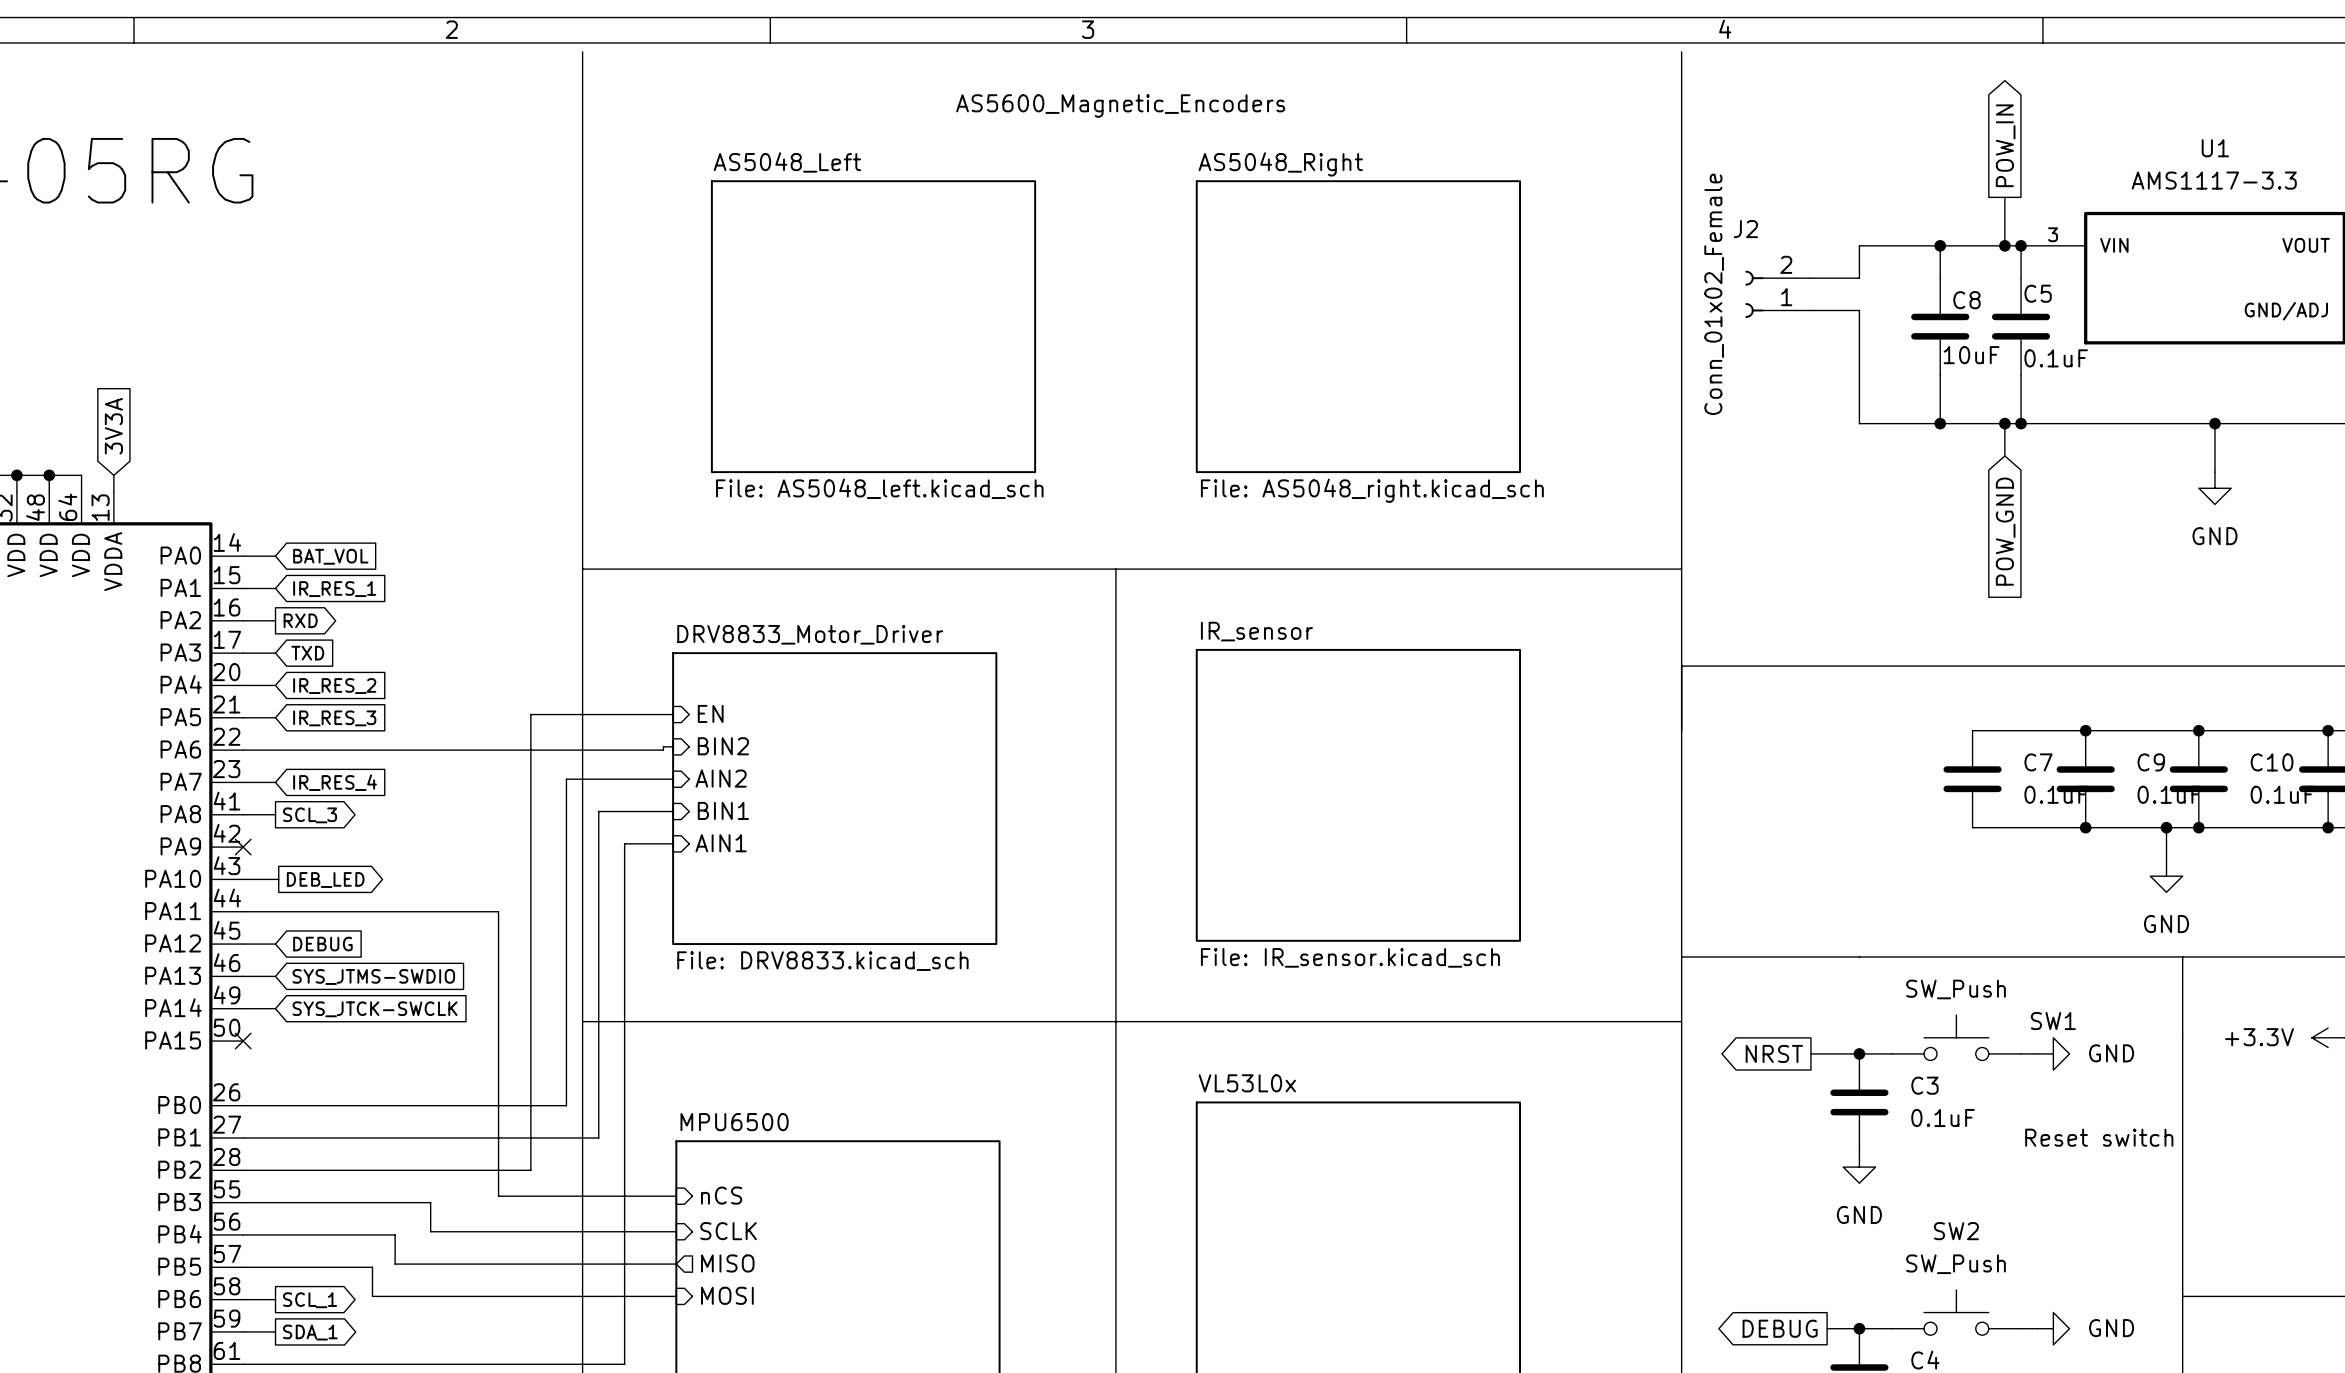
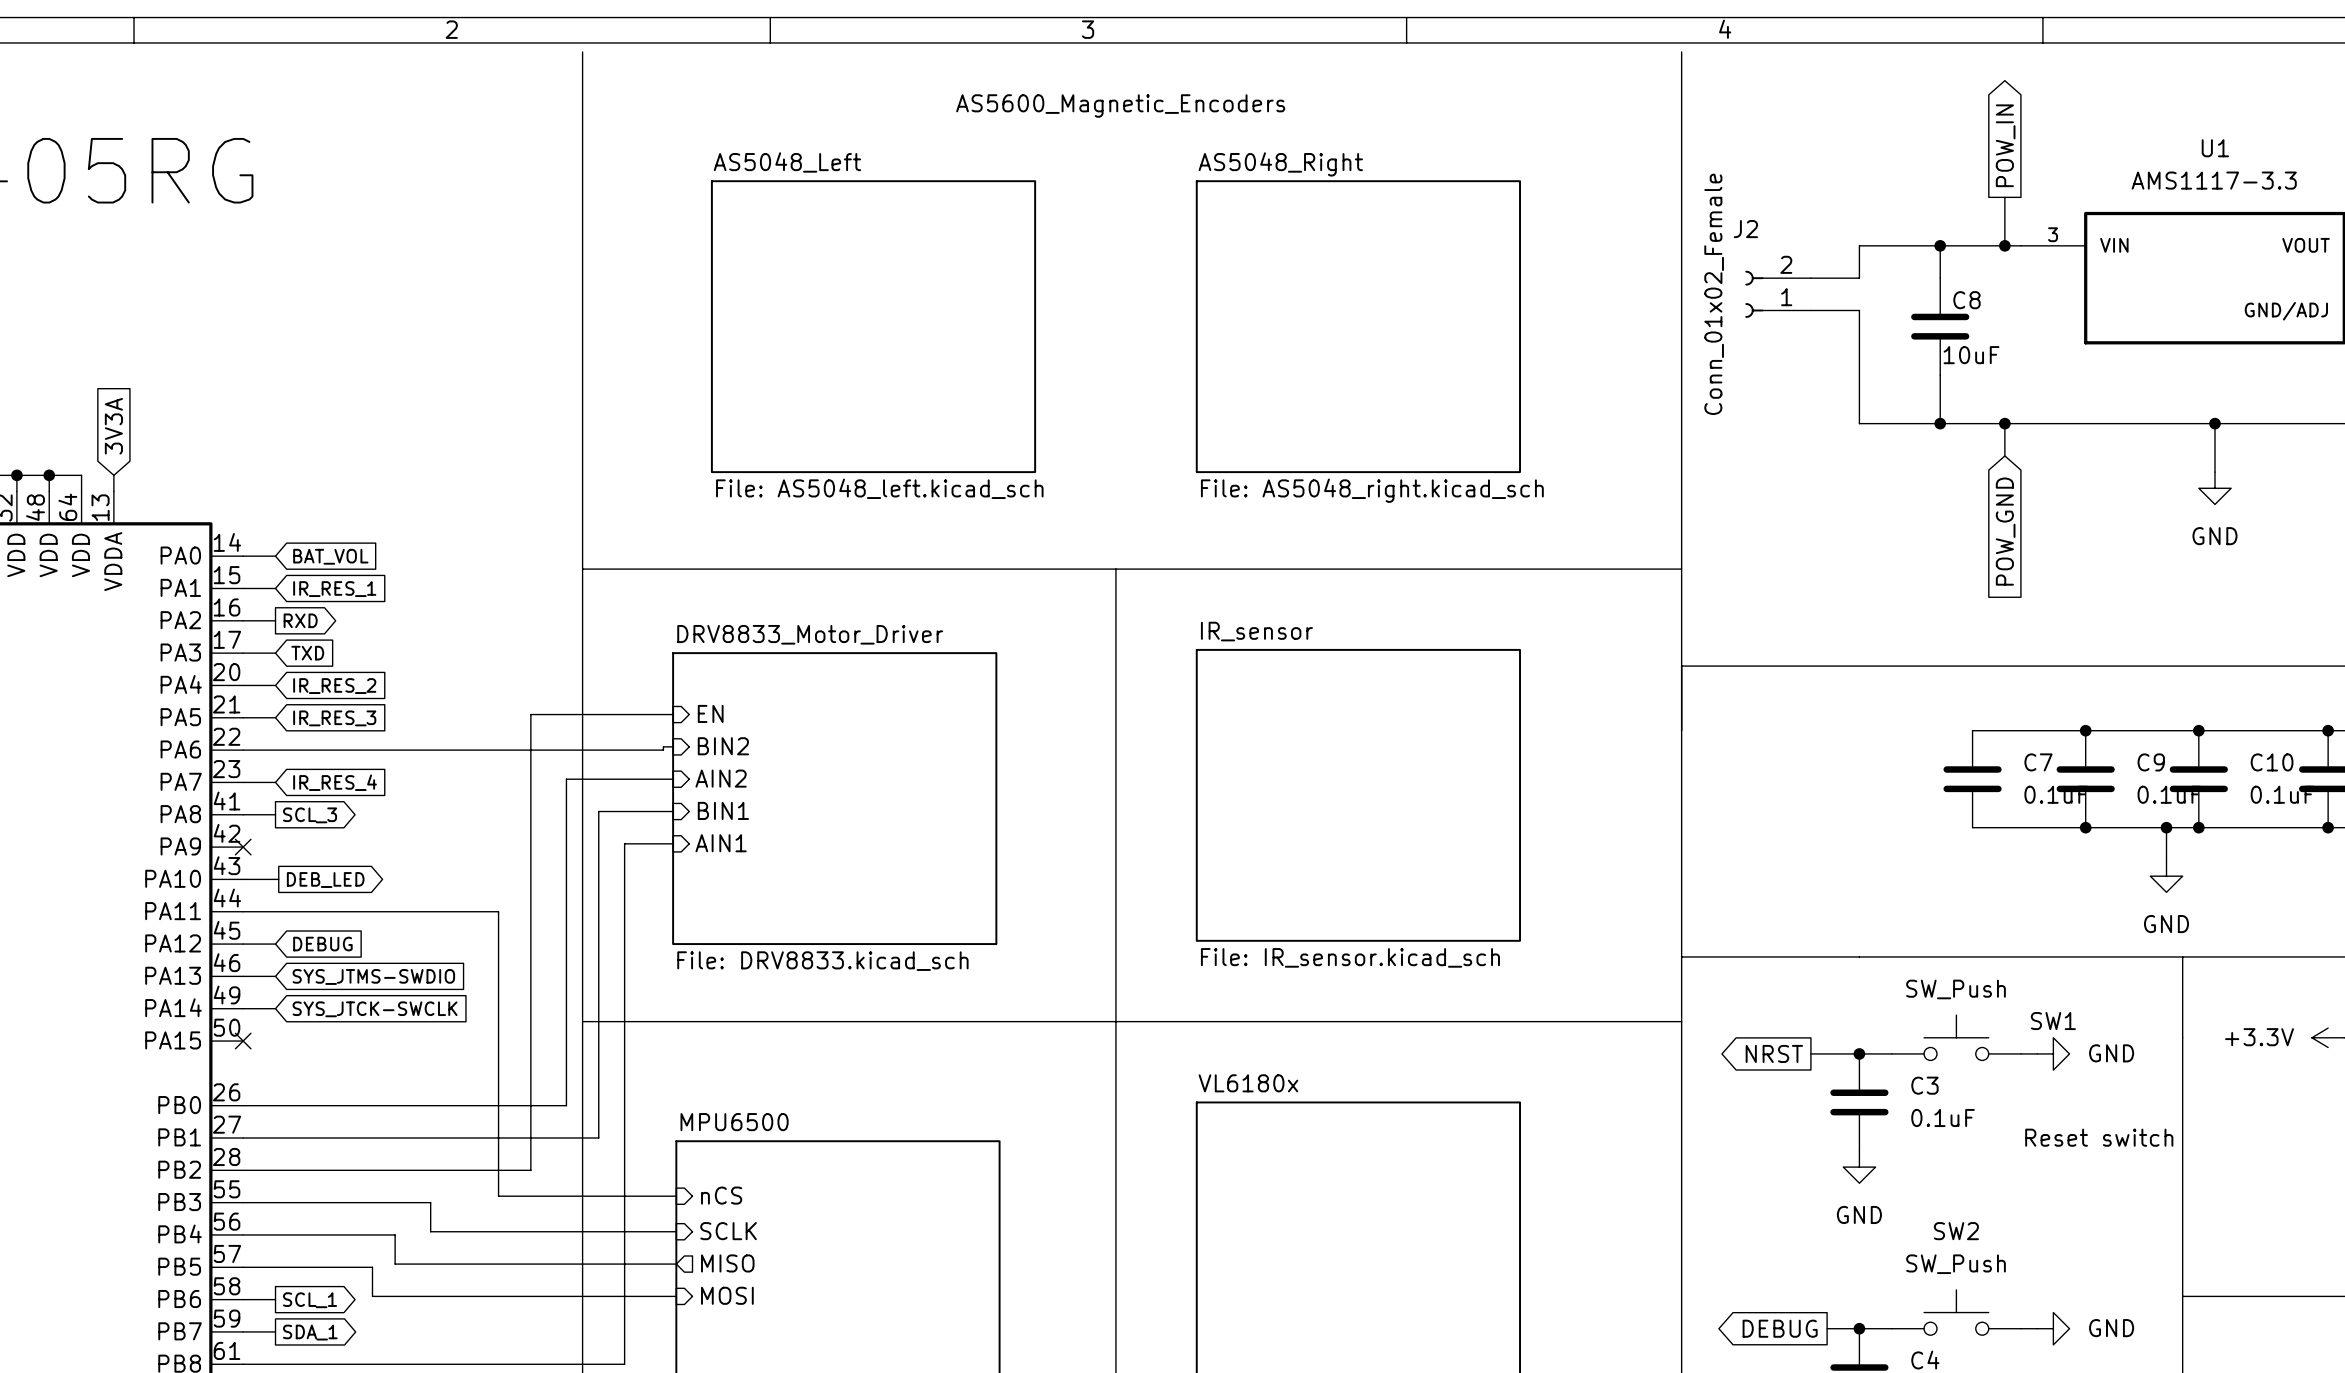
wire: (2021, 245) (2021, 278) -> none
junction: (2021, 245) -> none
C5: 0.1uF (2021, 326) -> none
wire: (2021, 375) (2021, 423) -> none
junction: (2021, 423) -> none
sheet VL53L0x name: VL53L0x (1247, 1083) -> VL6180x (1248, 1083)

